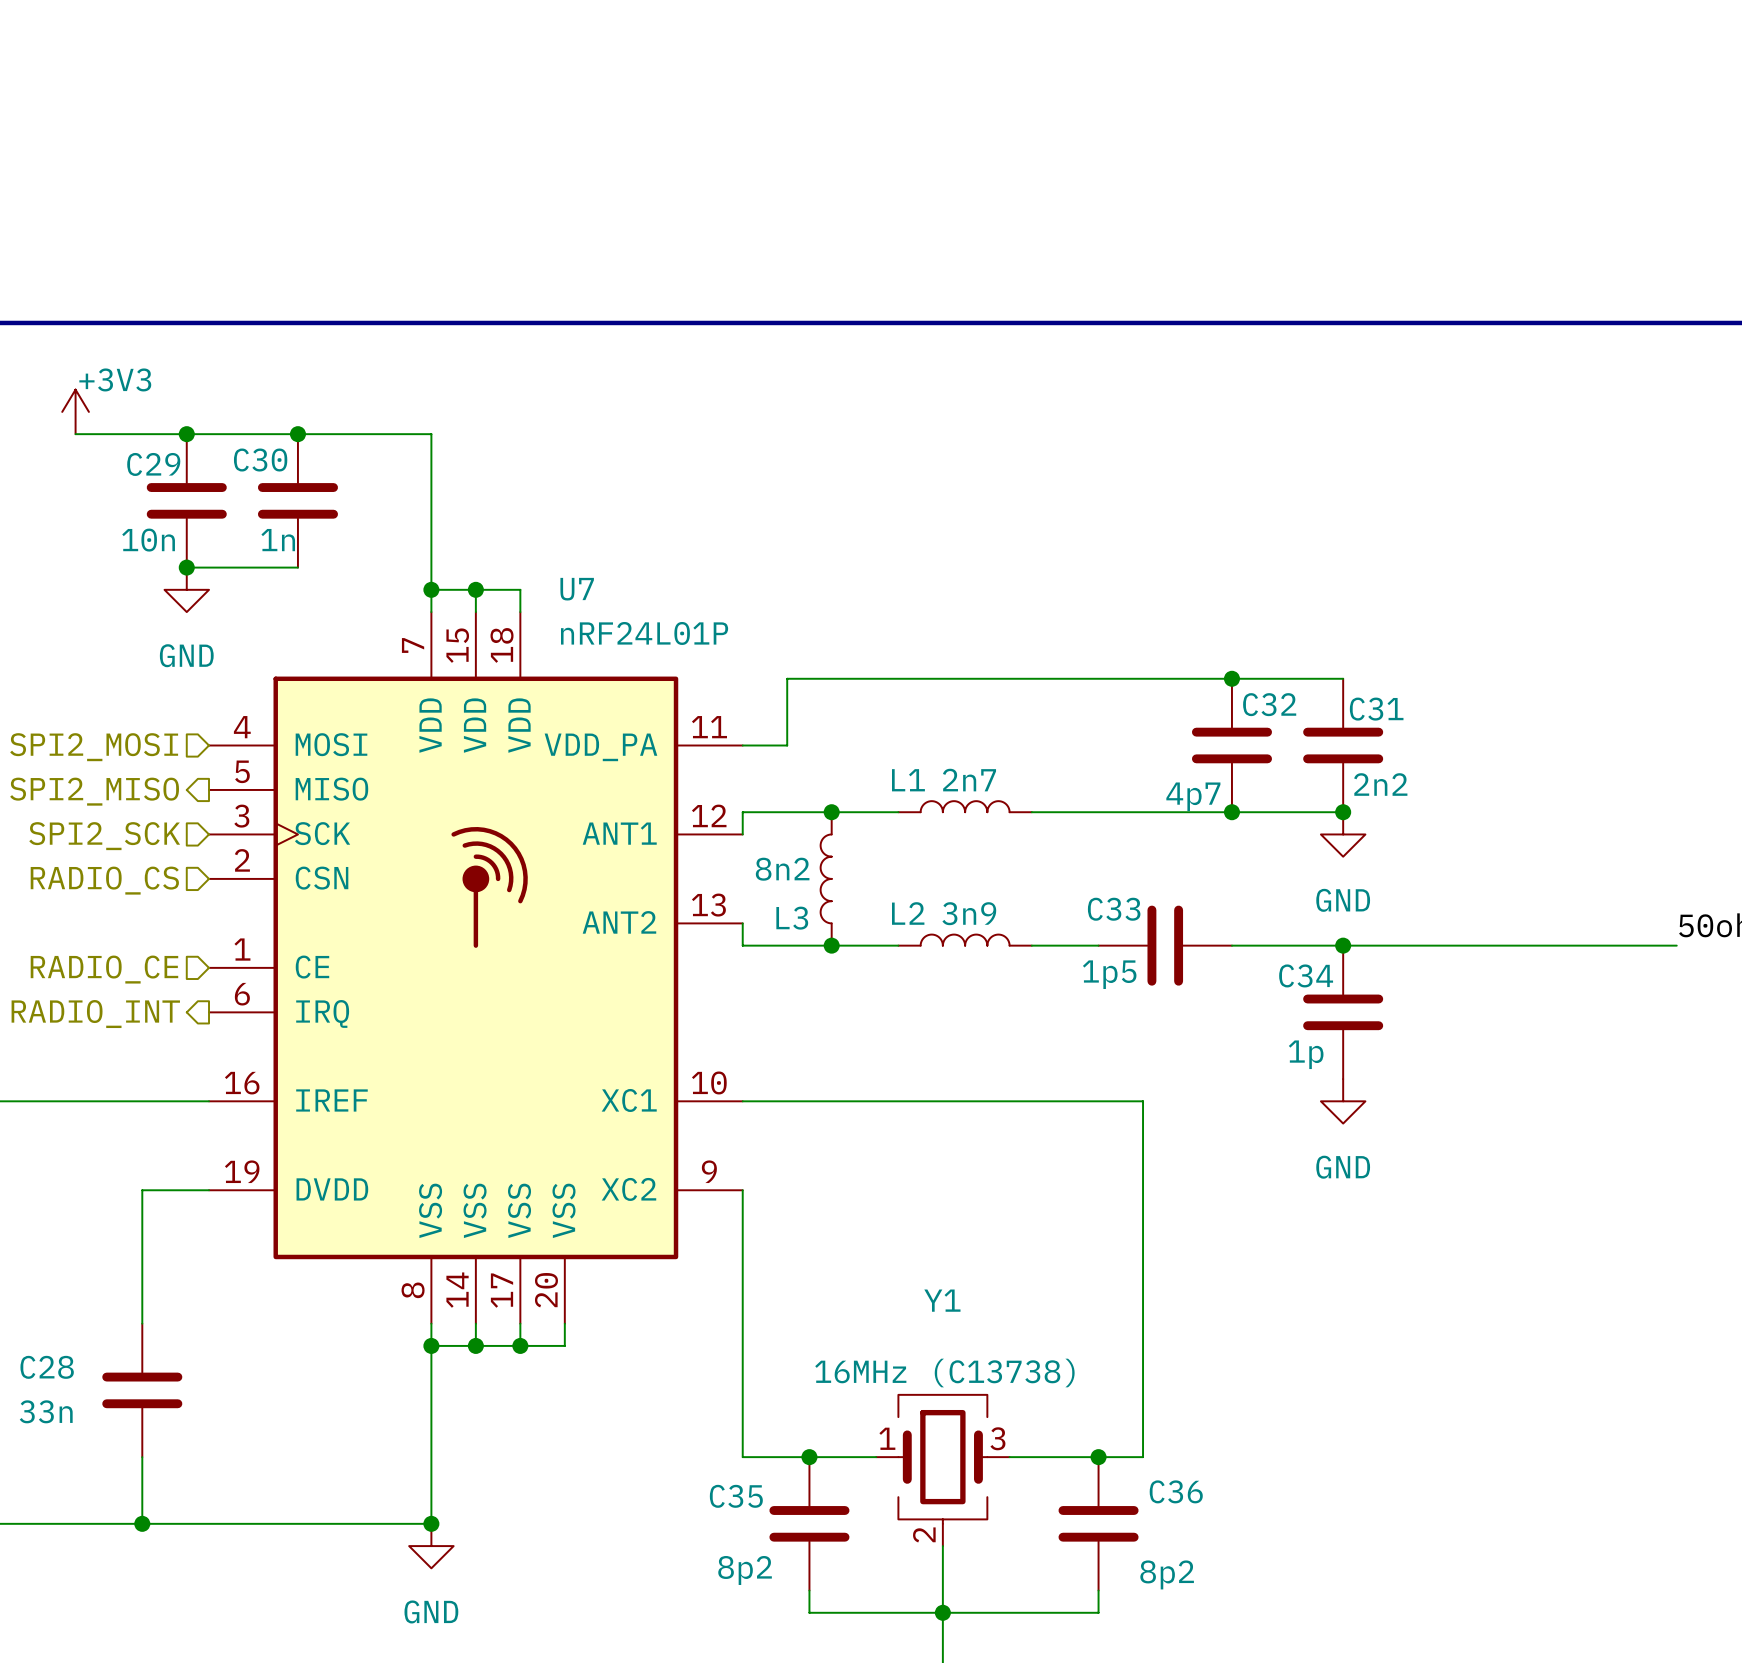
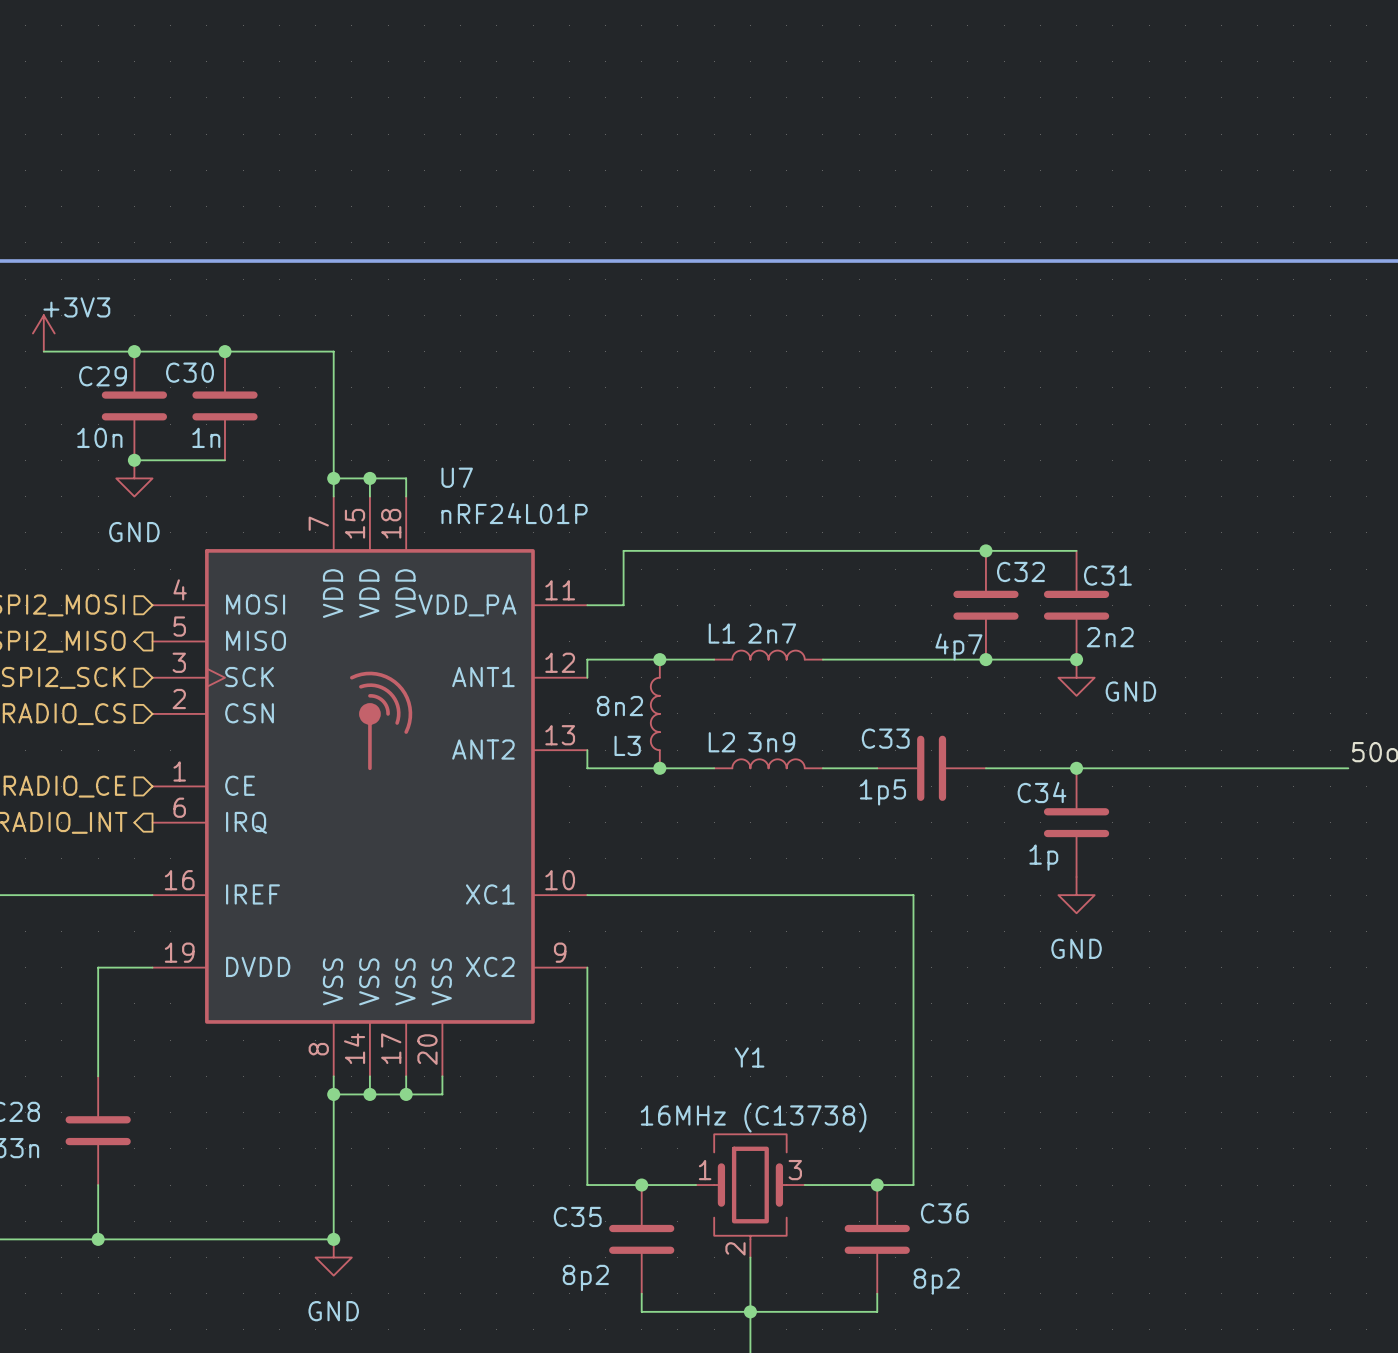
power symbol text position: GND (1343, 900) -> GND (1130, 691)

